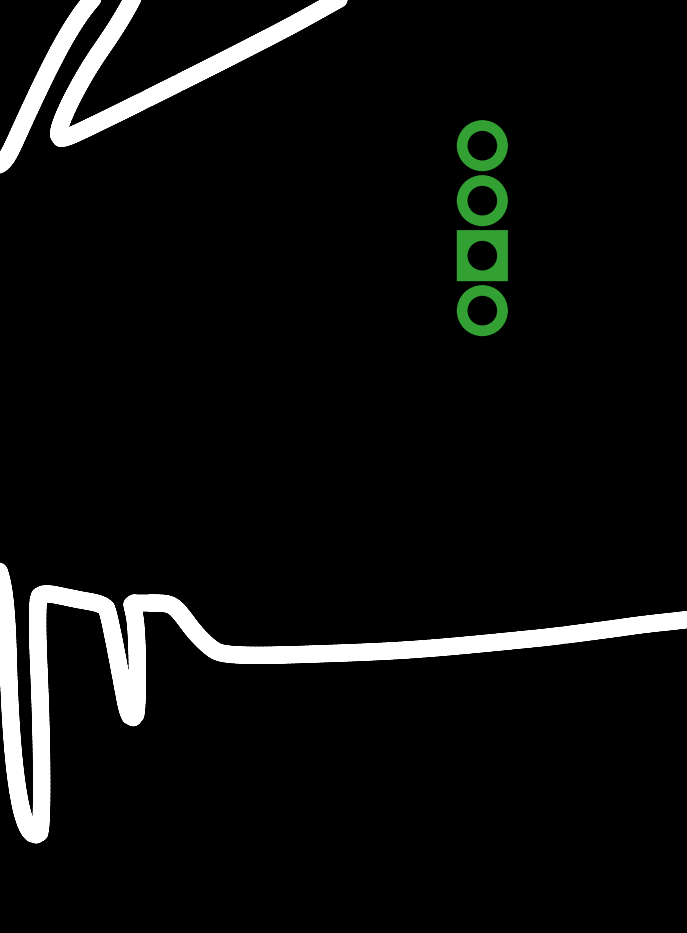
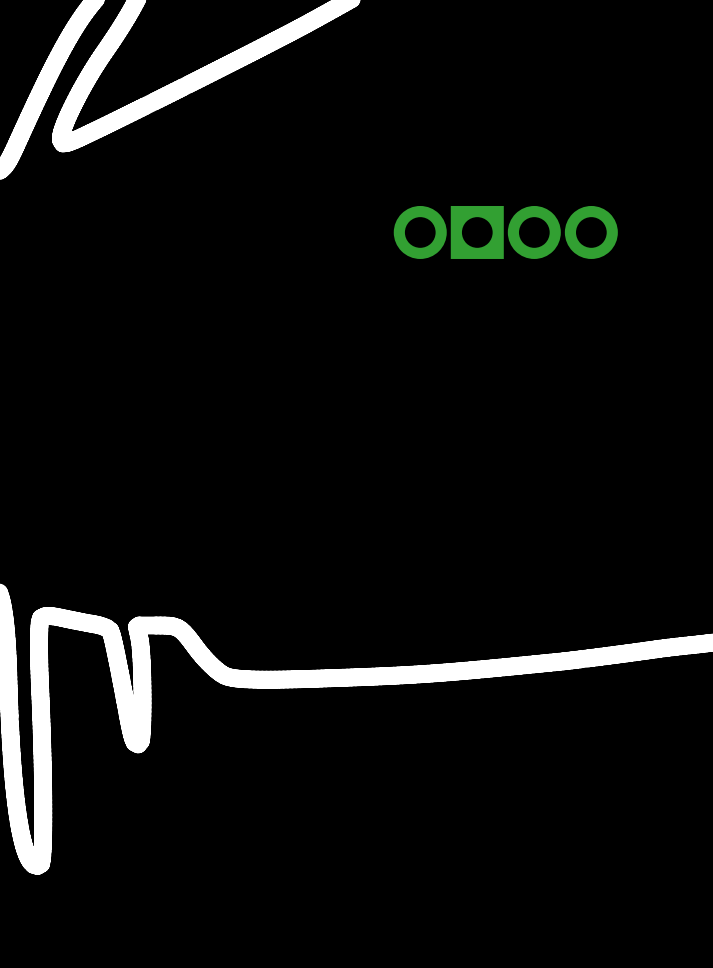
part rotation: 0° (482, 228) -> 90° clockwise (505, 232)

